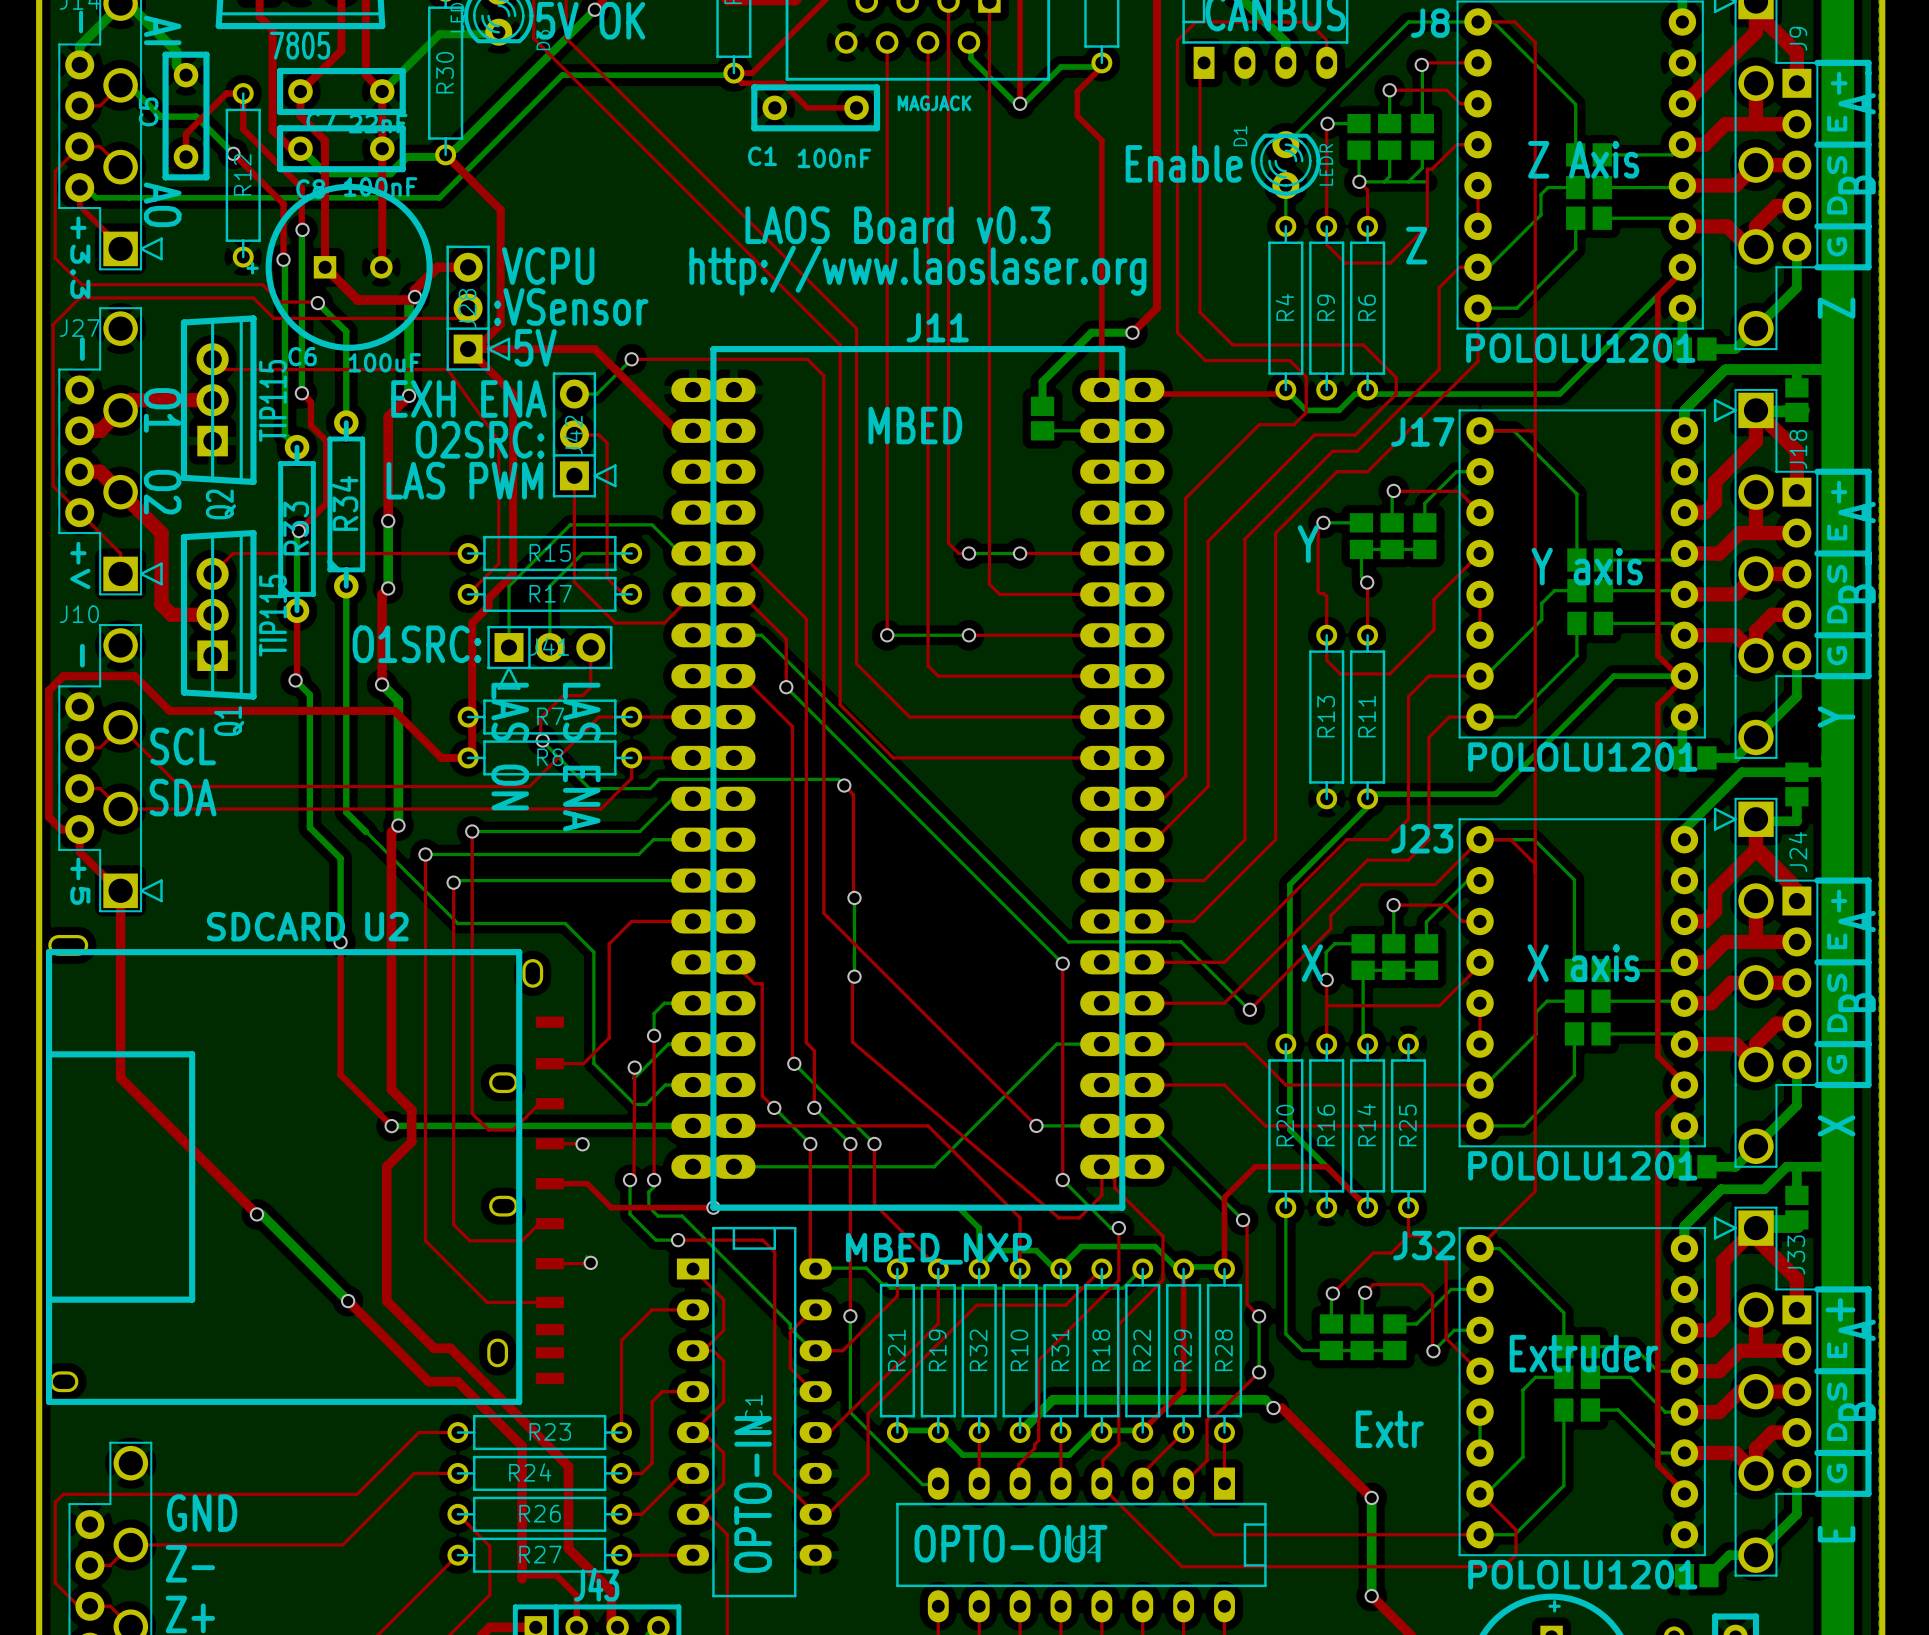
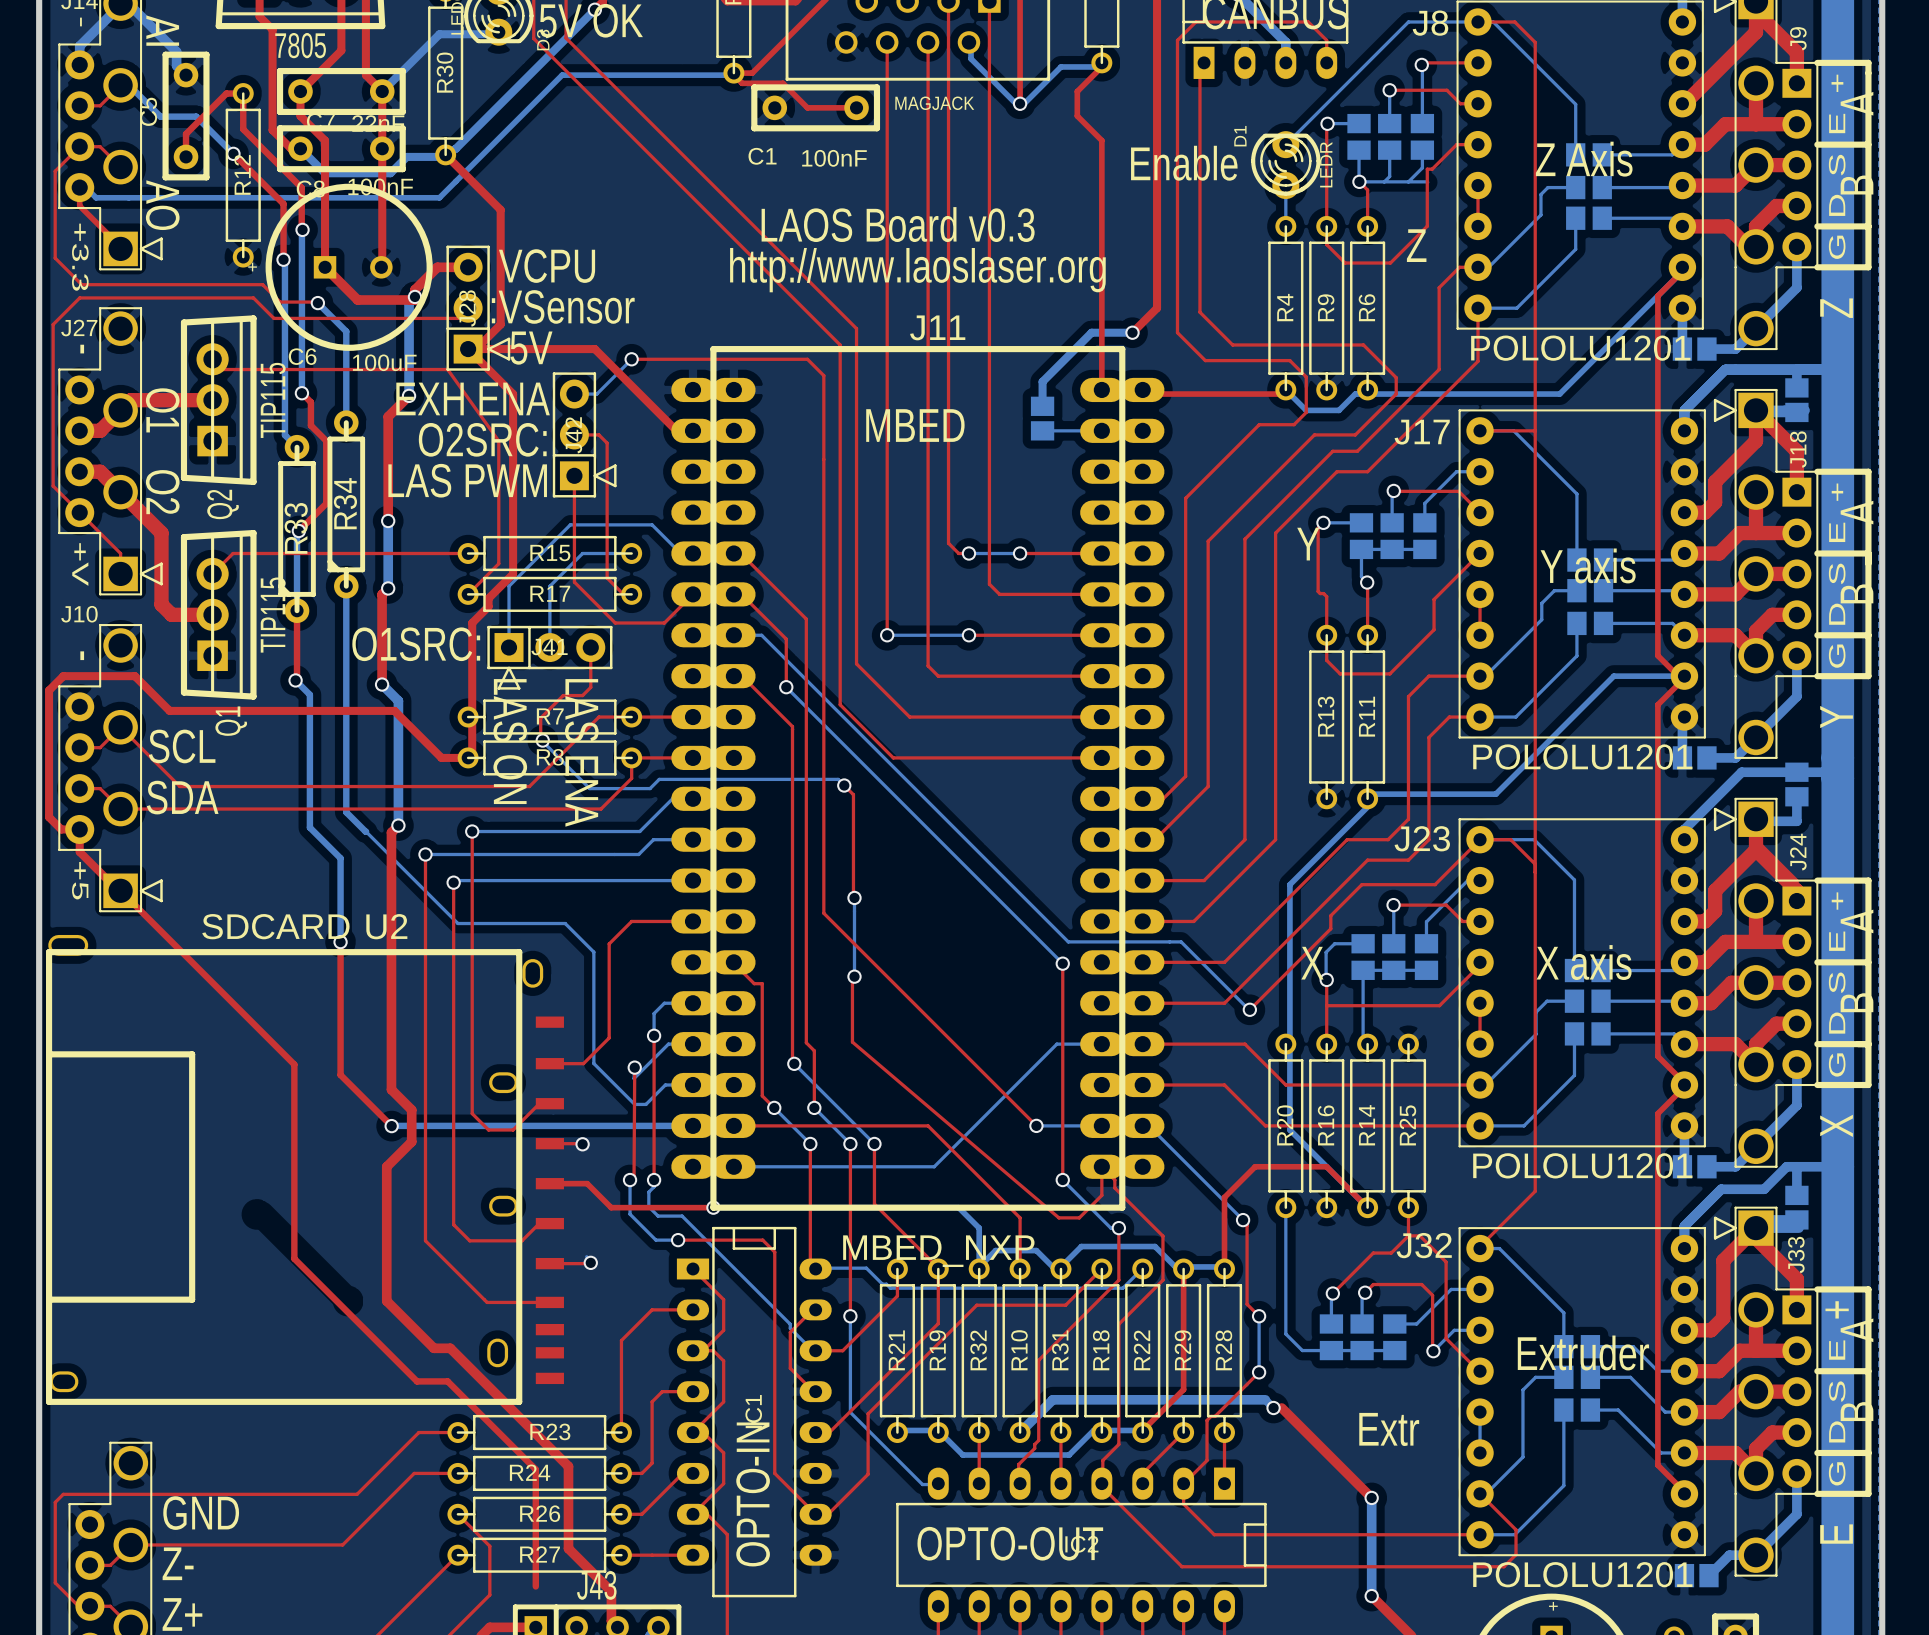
top track: (120, 890) (120, 1078) (256, 1214) -> (120, 890) (294, 1064) (294, 1258) (417, 1381) (447, 1381) (535, 1469) (535, 1586)
bottom track: (256, 1214) (261, 1214) (348, 1301) -> none
via: (256, 1214) -> none
top track: (348, 1301) (428, 1381) (457, 1381) (522, 1446) (522, 1578) -> none
via: (348, 1301) -> none
top track: (522, 1575) (556, 1575) (576, 1595) (576, 1627) -> none

